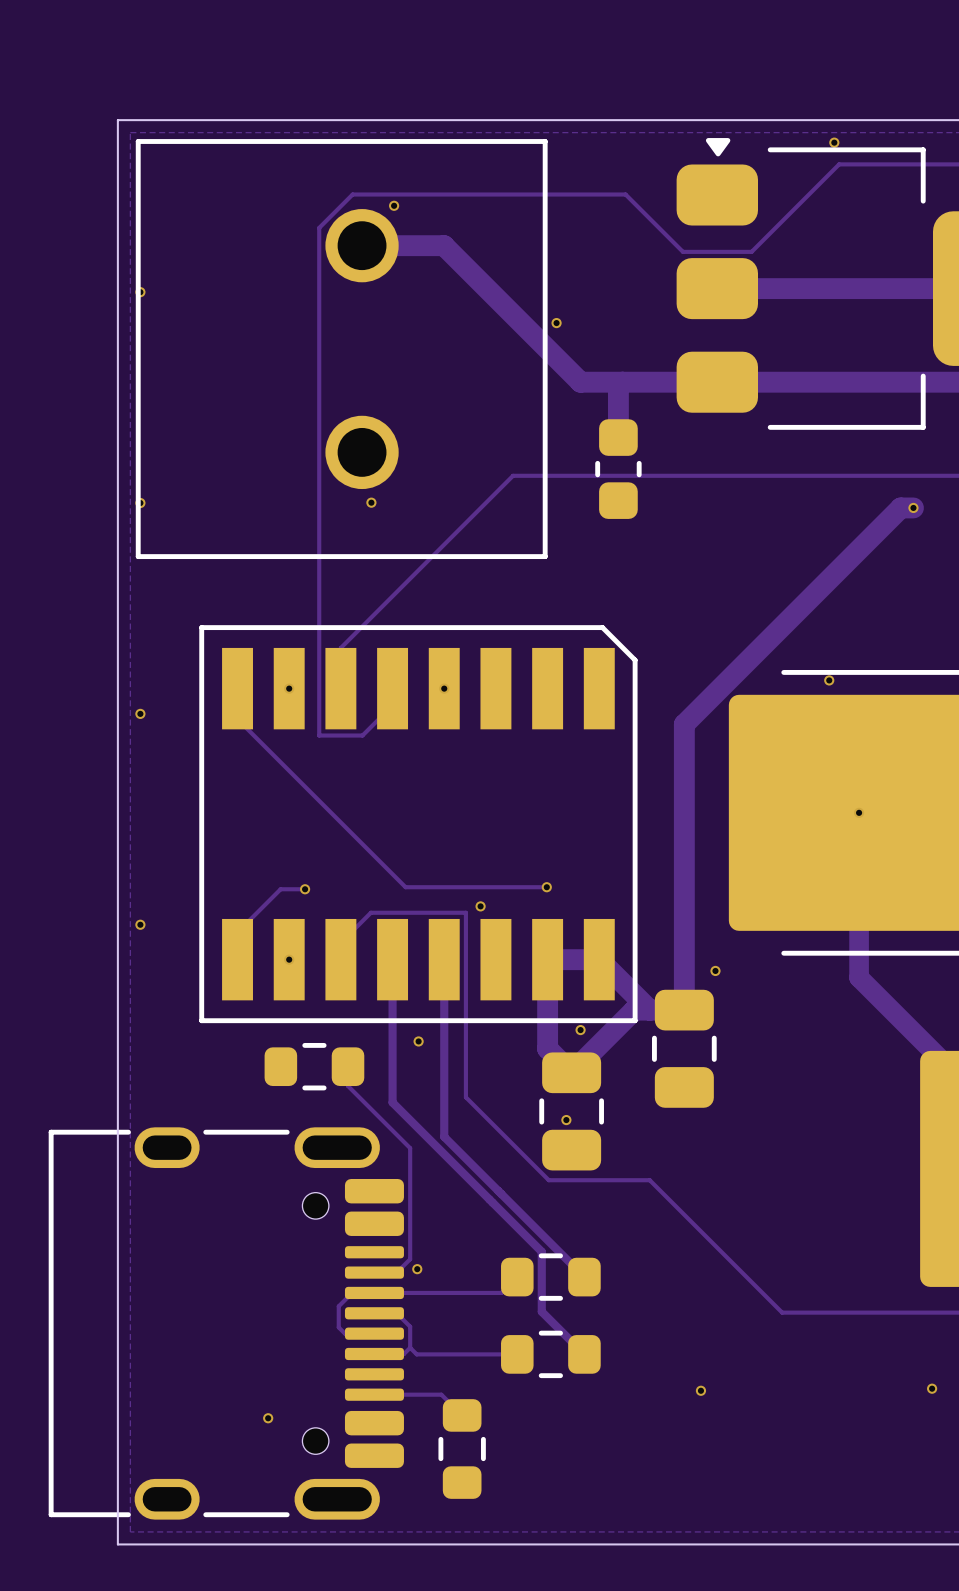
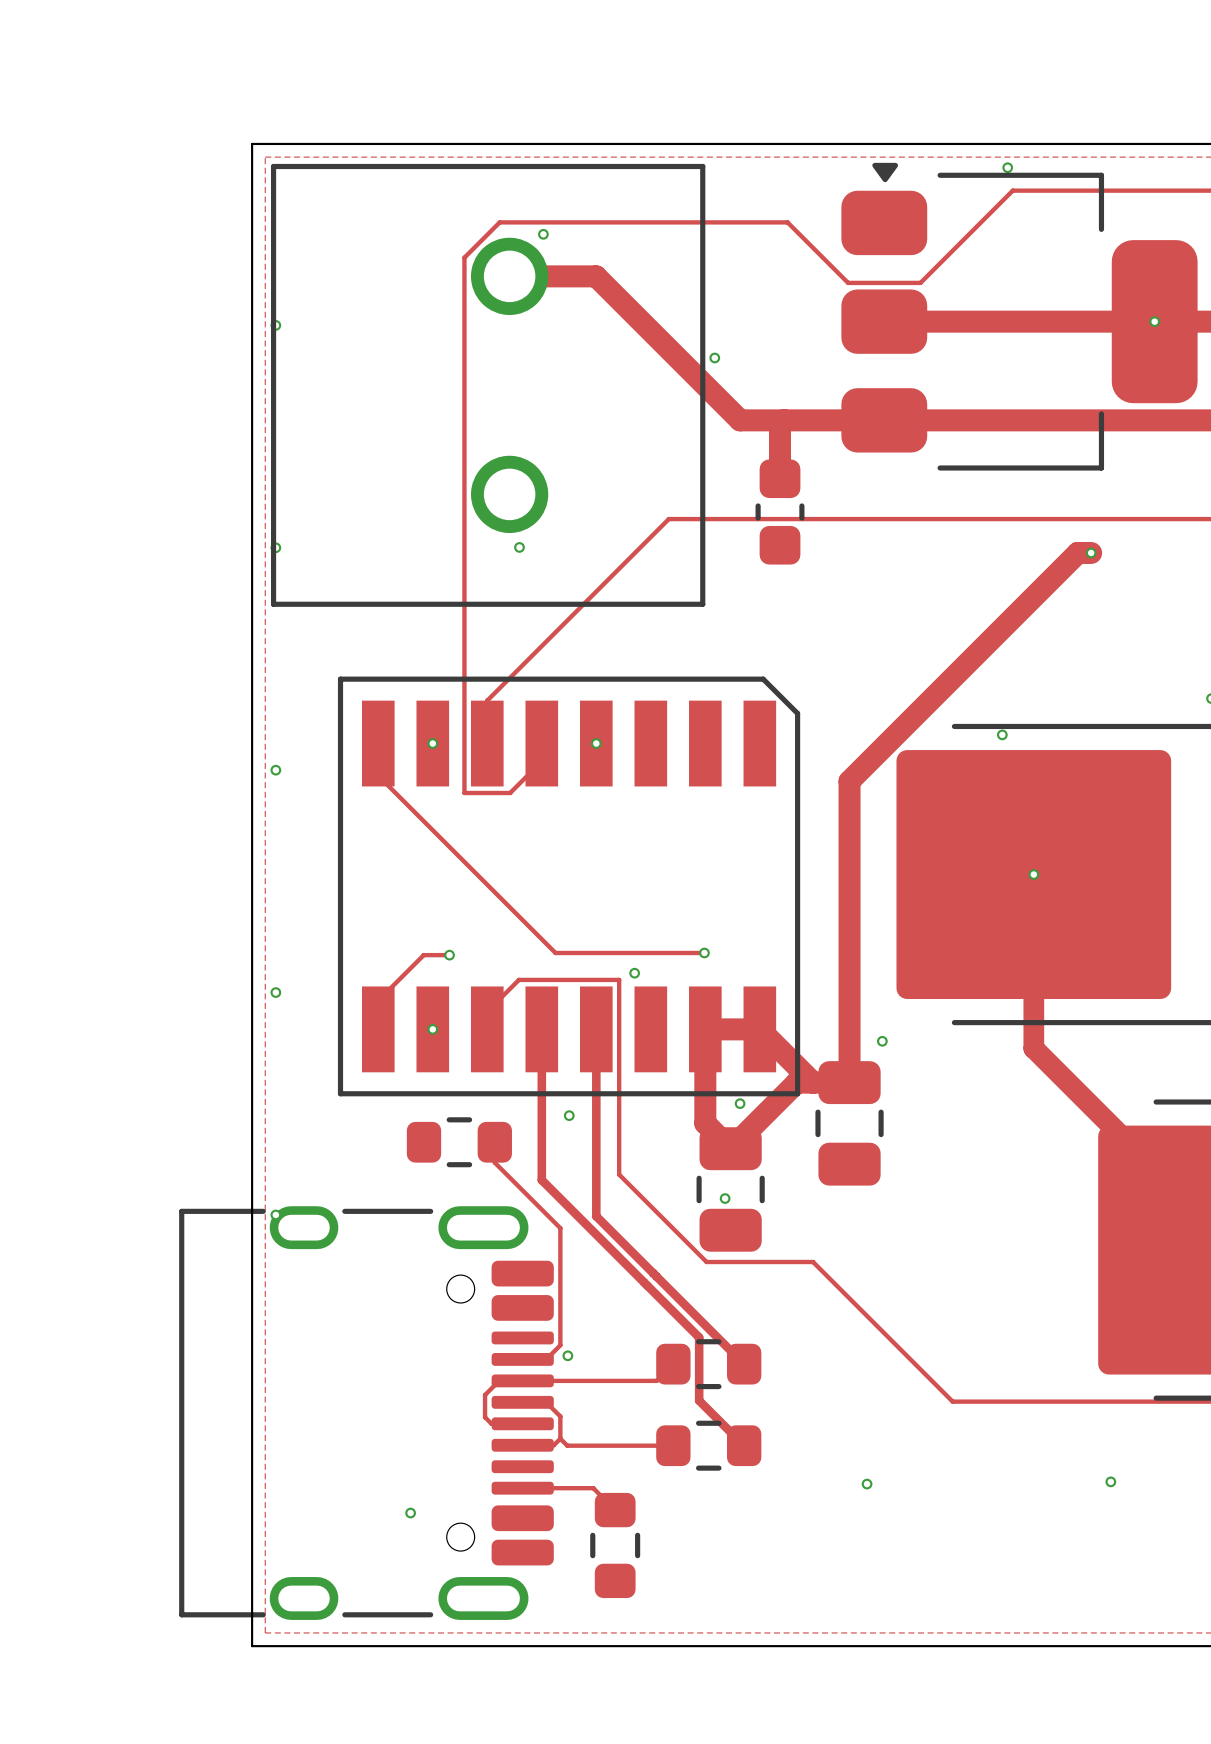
via: none -> (275, 1214)

